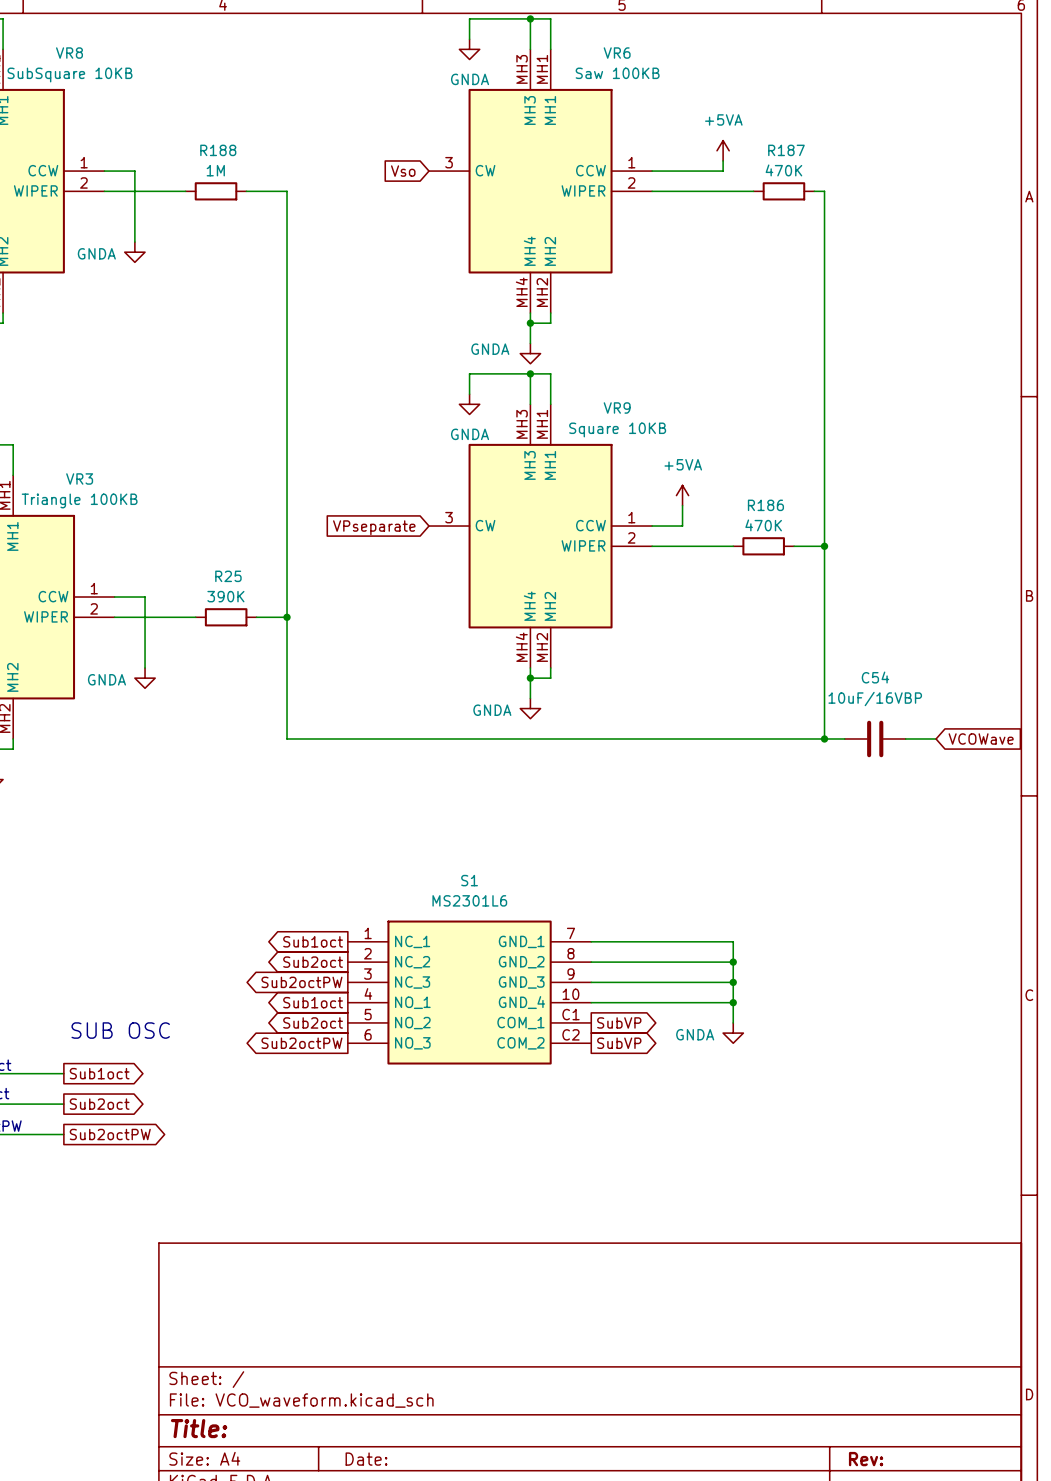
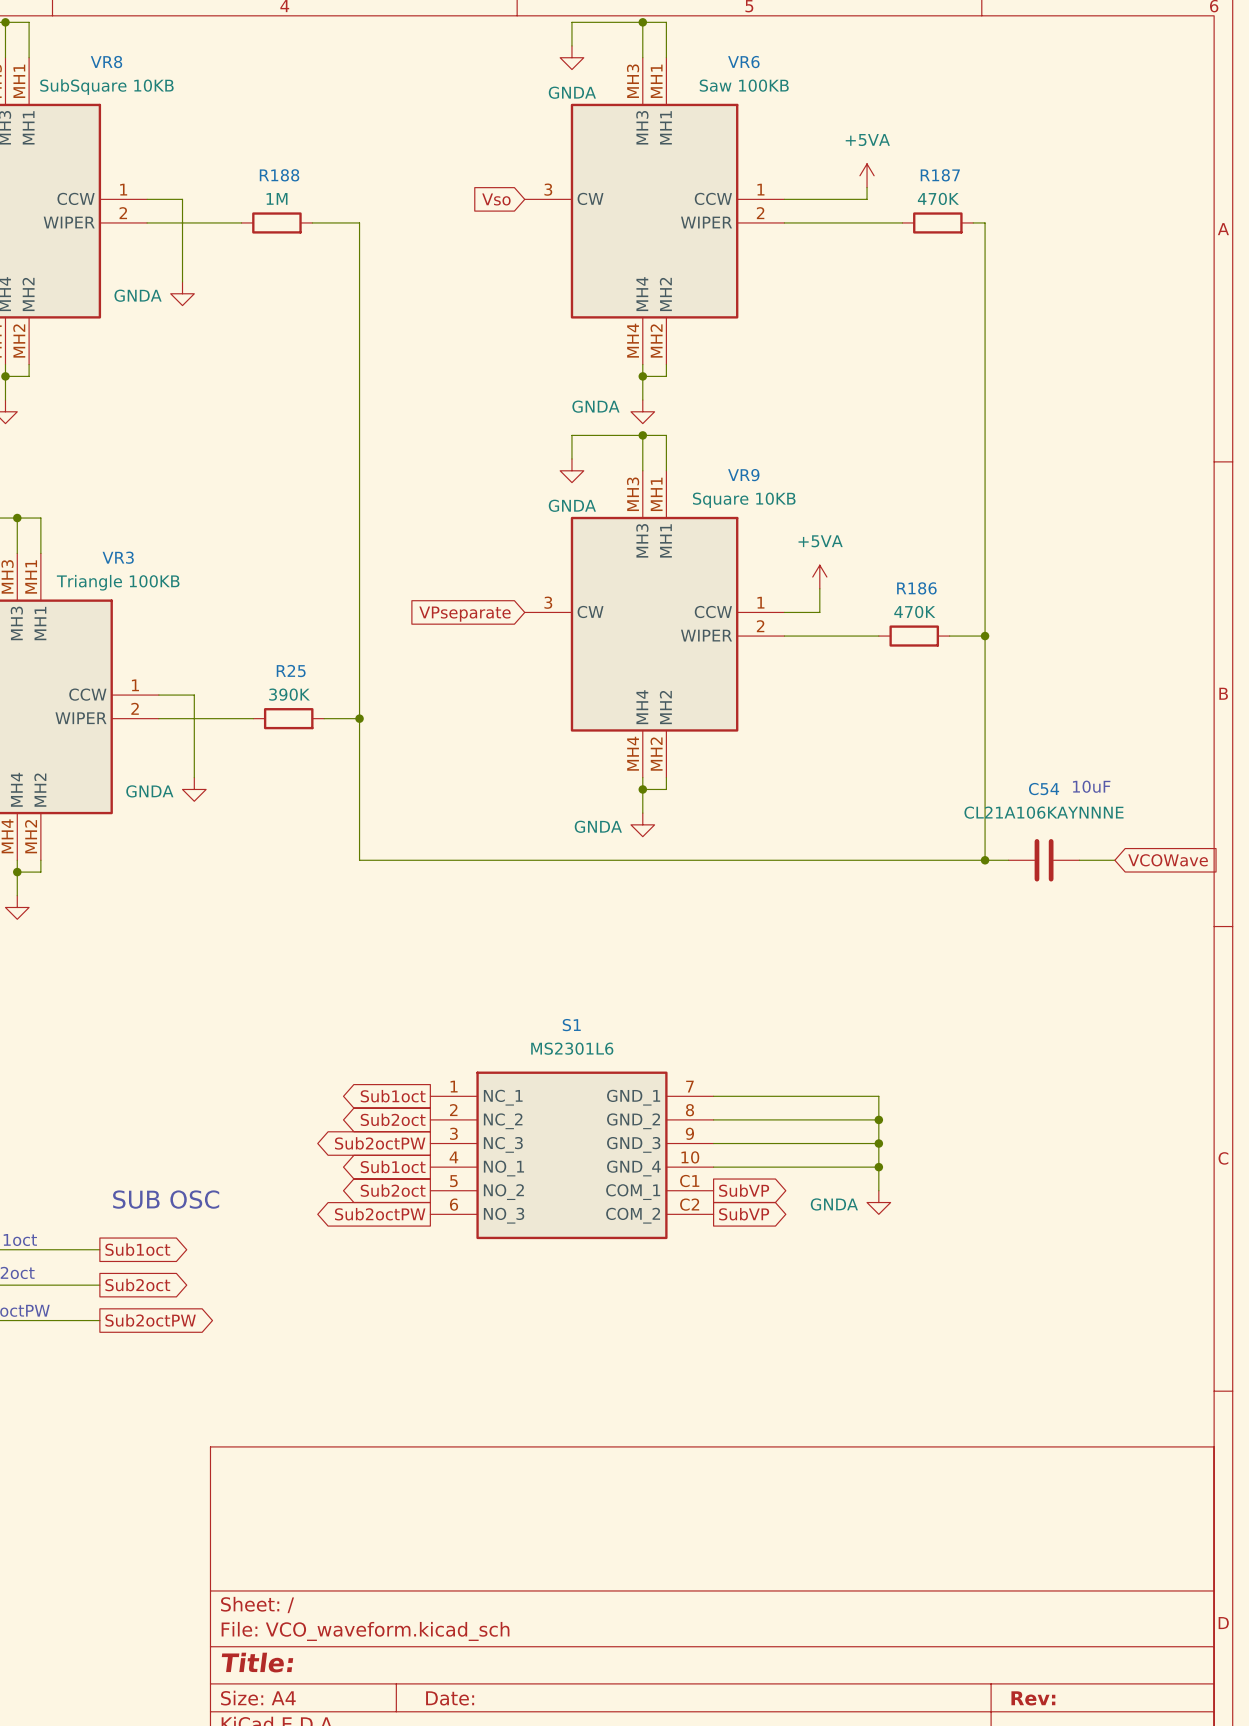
text: none -> 10uF (1091, 786)
C54 value: 10uF/16VBP (875, 699) -> CL21A106KAYNNNE (1043, 812)

